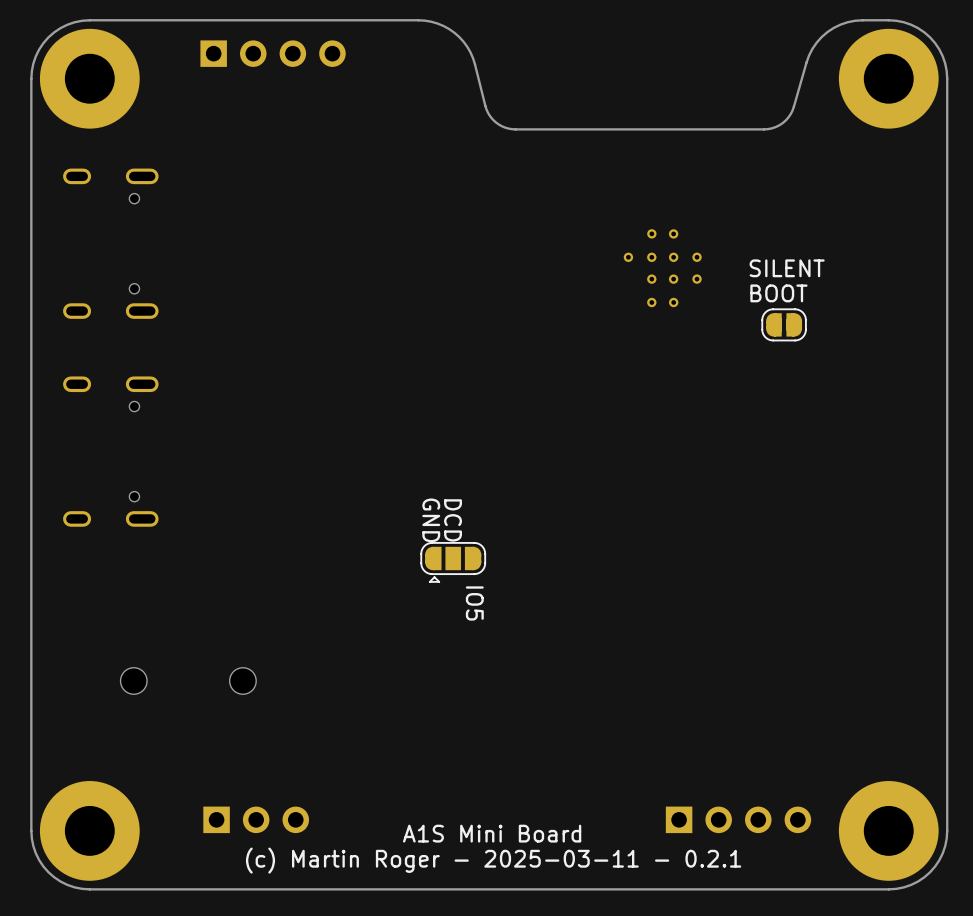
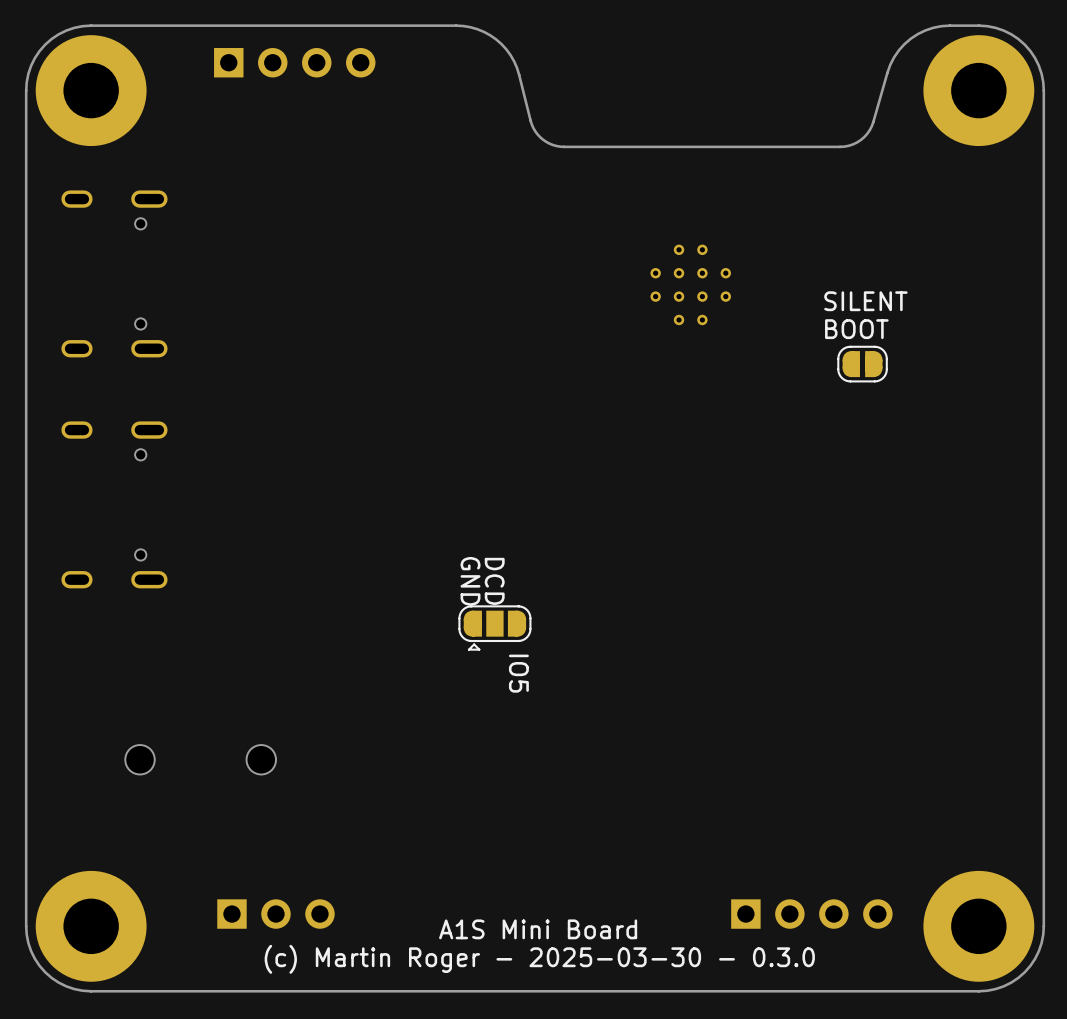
part: none -> (690, 284)
part: (662, 268) -> none
text: (c) Martin Roger - 2025-03-11 - 0.2.1 (493, 860) -> (c) Martin Roger - 2025-03-30 - 0.3.0 (539, 959)

